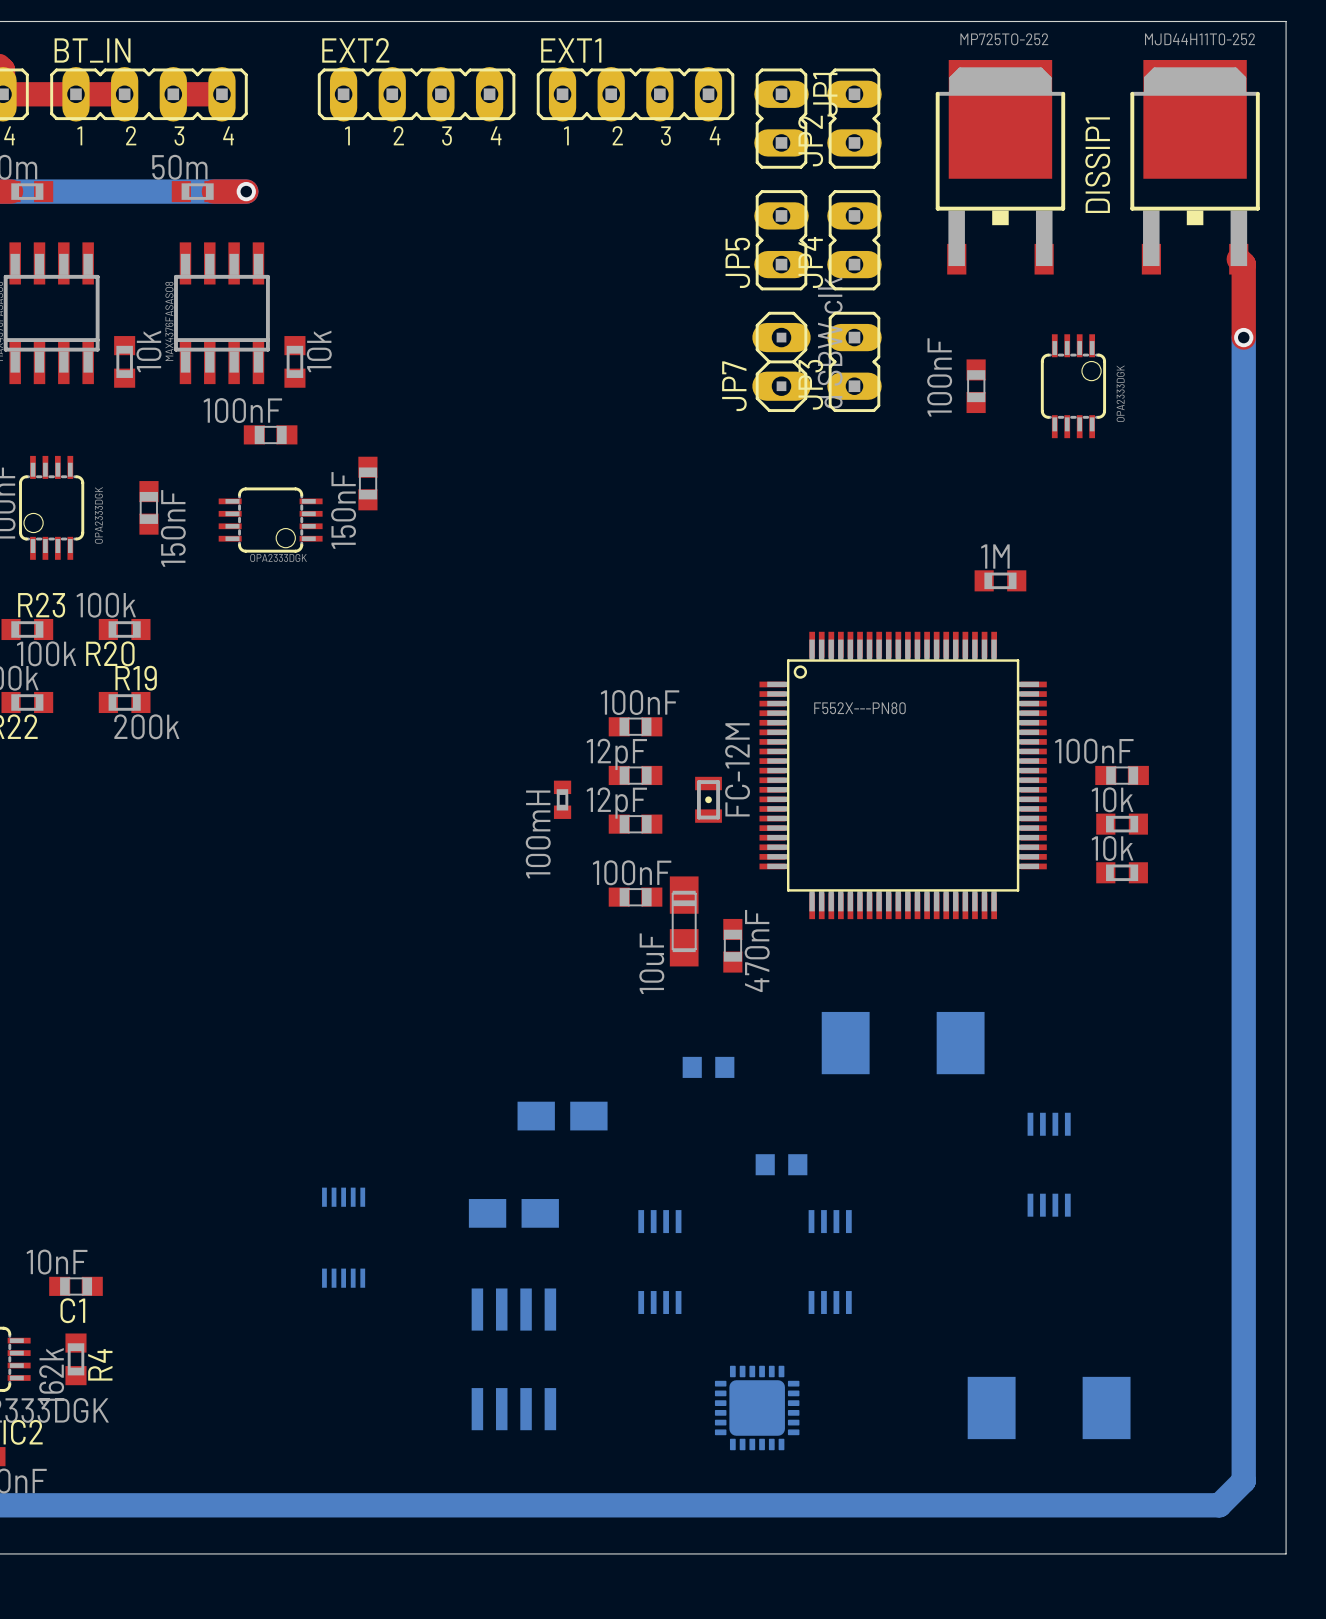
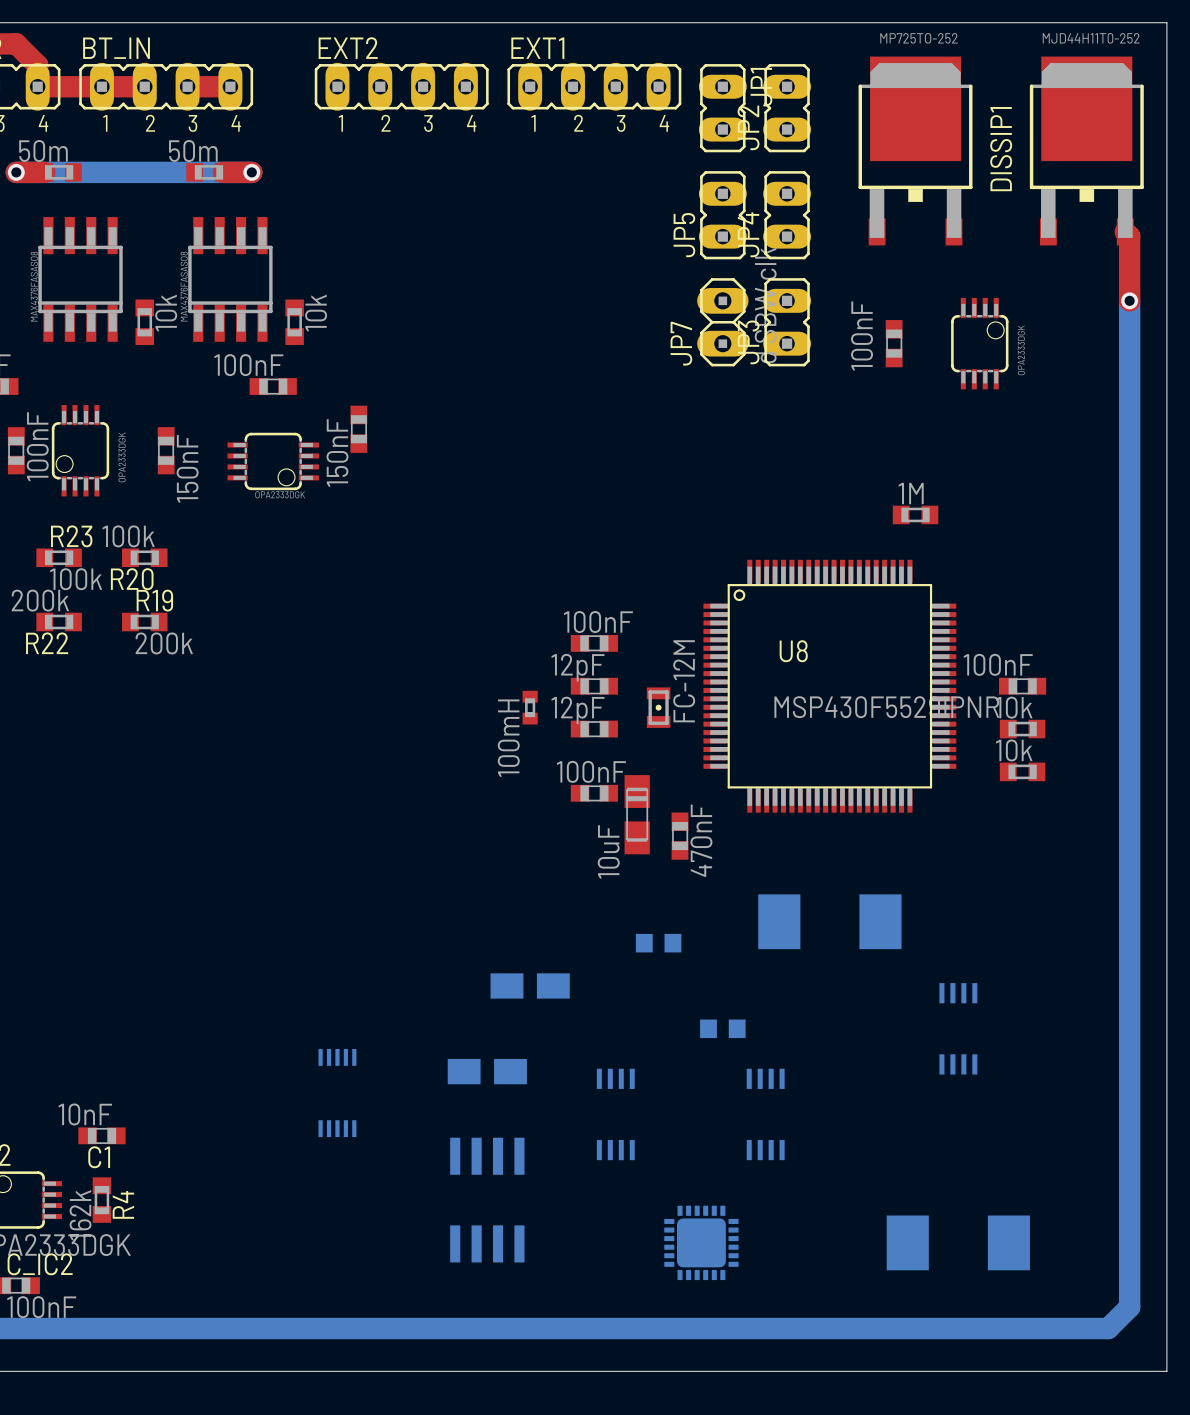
U8 value: F552X---PN80 (859, 708) -> MSP430F5529IPNR (886, 707)
U8 name: none -> U8 (793, 651)

